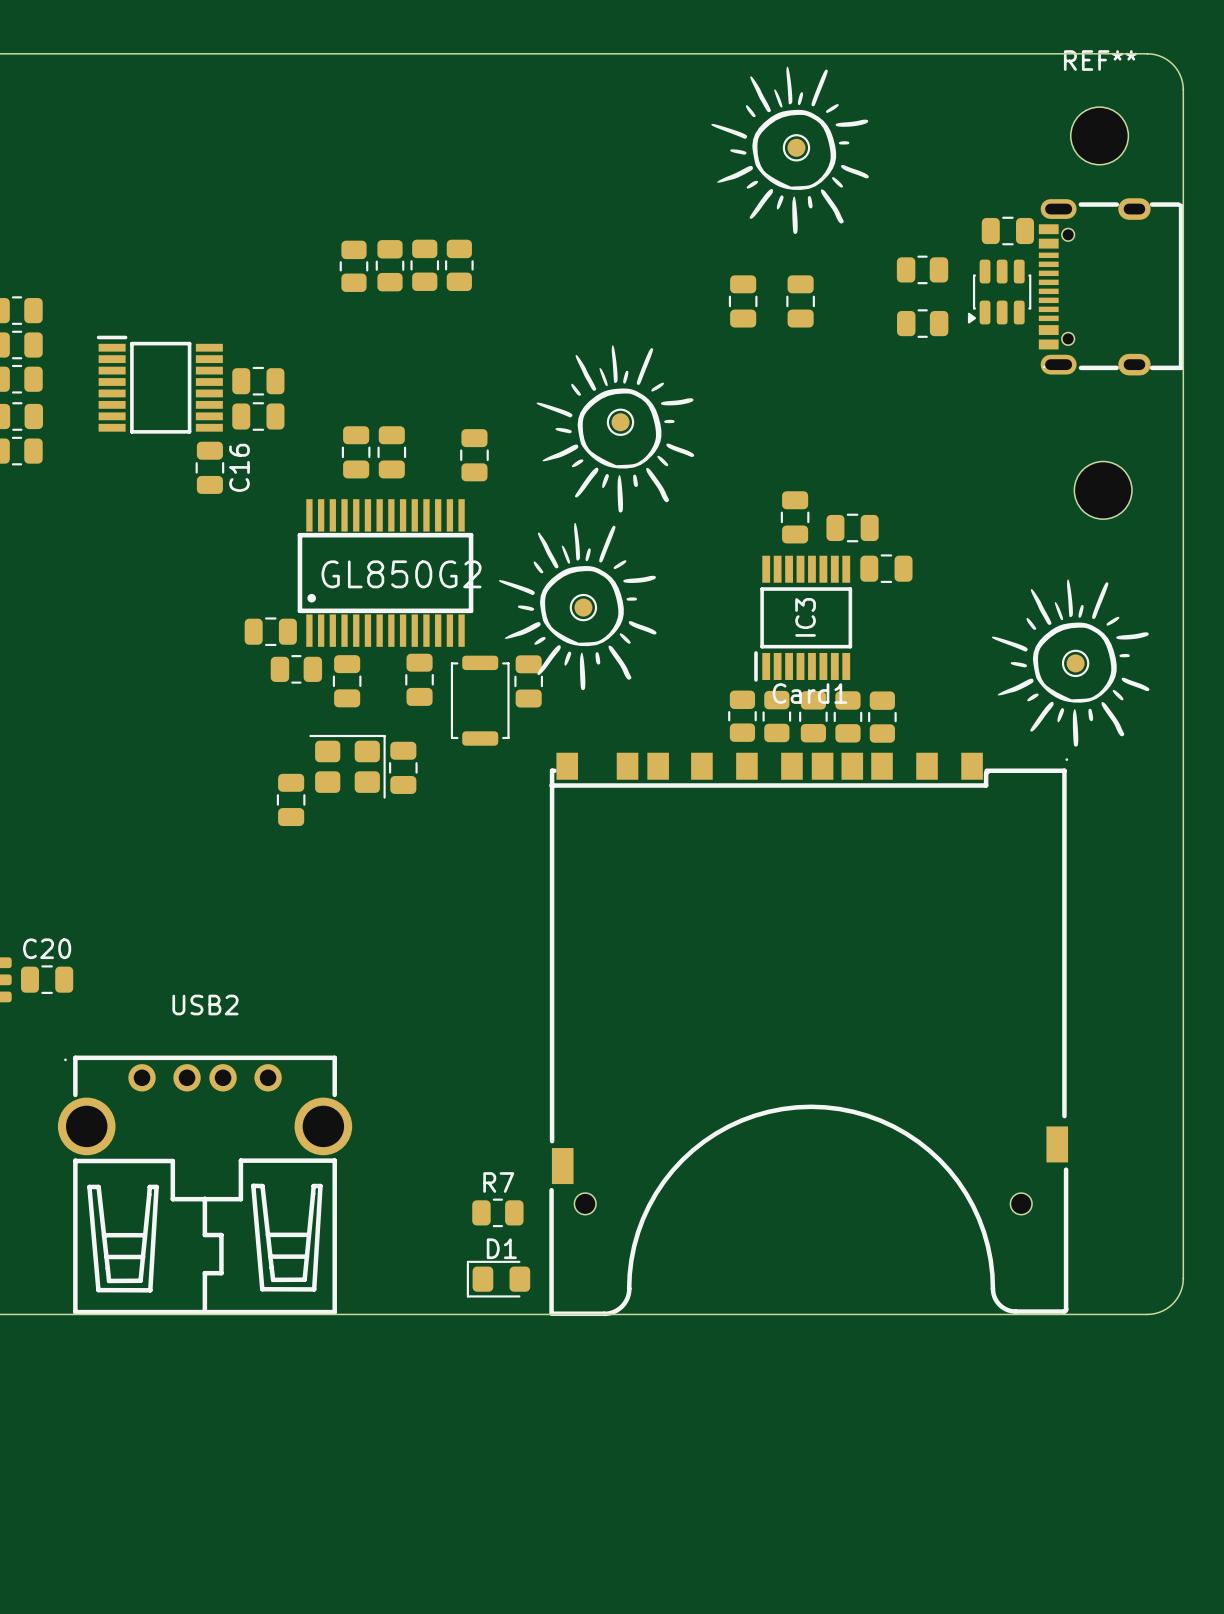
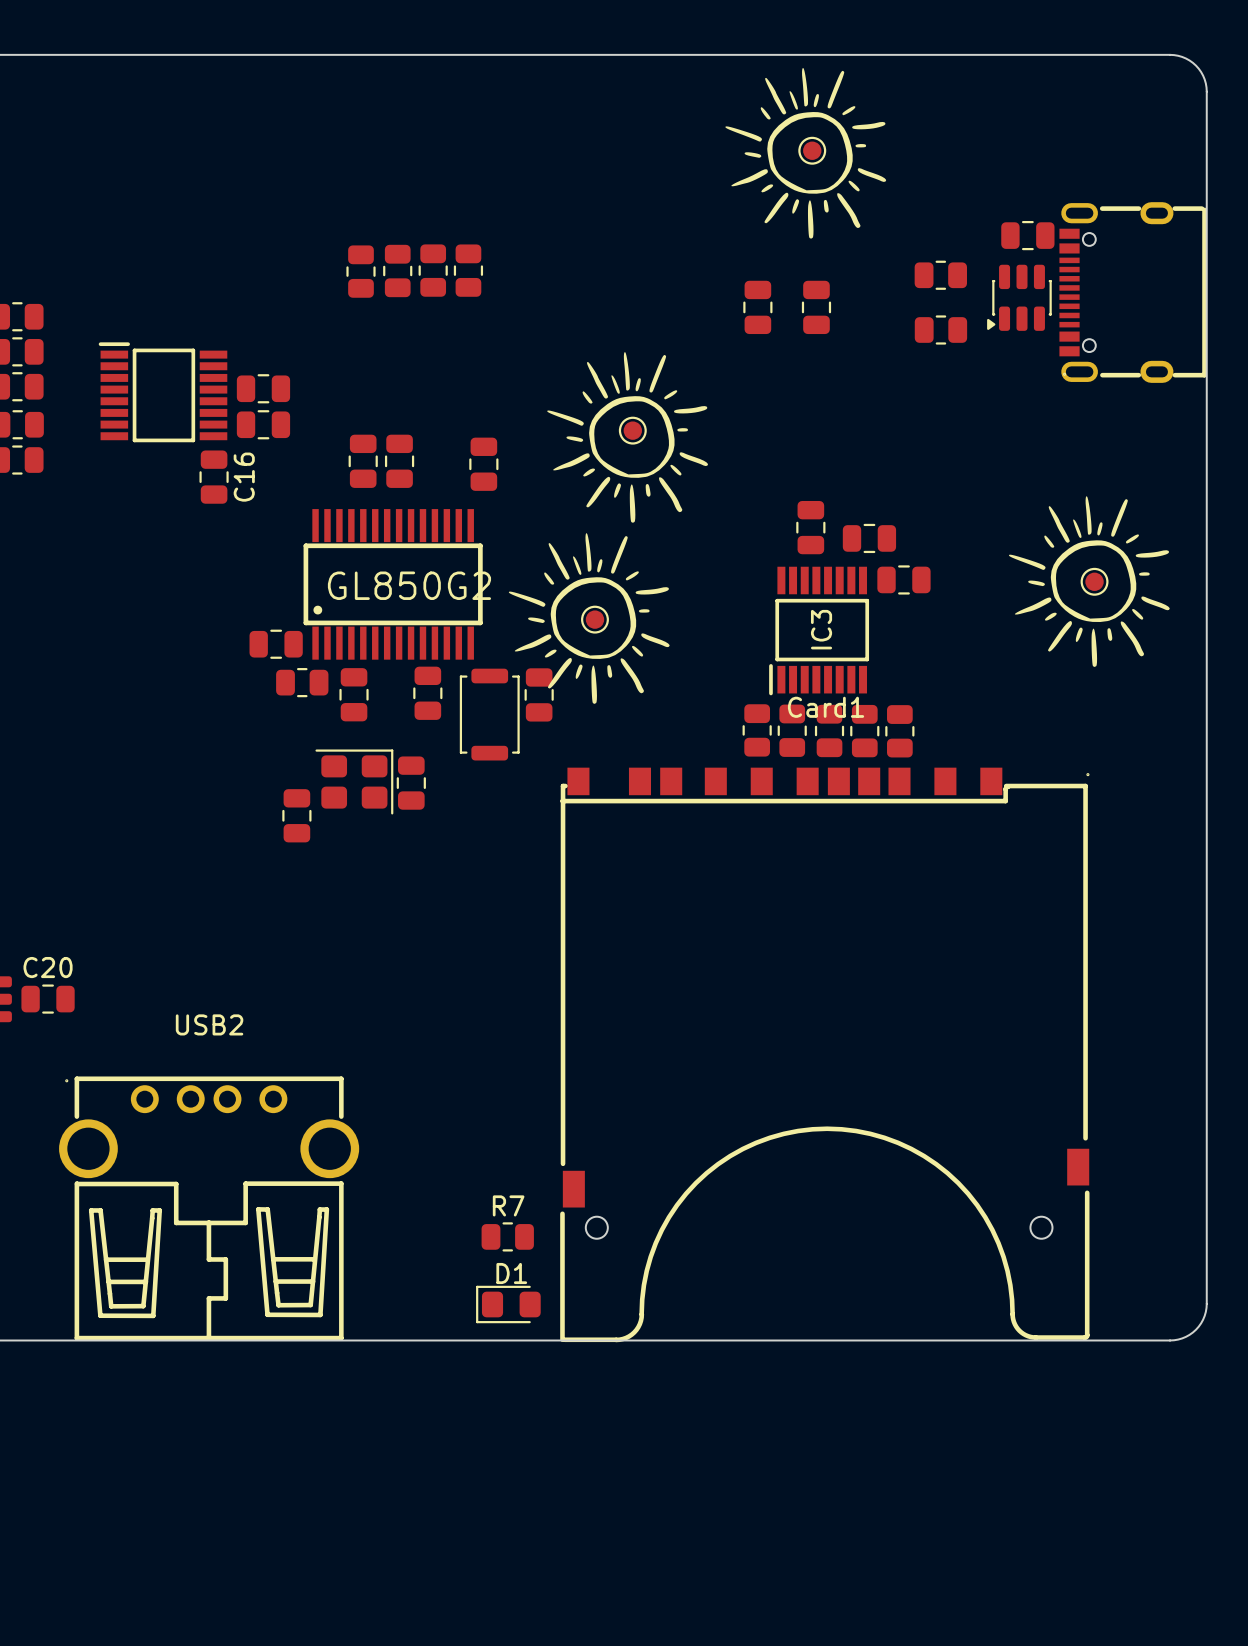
REF**: (1099, 135) -> none
part: (1103, 490) -> none
drawing position: (1070, 663) -> (1089, 581)
part position: (1075, 663) -> (1094, 581)

